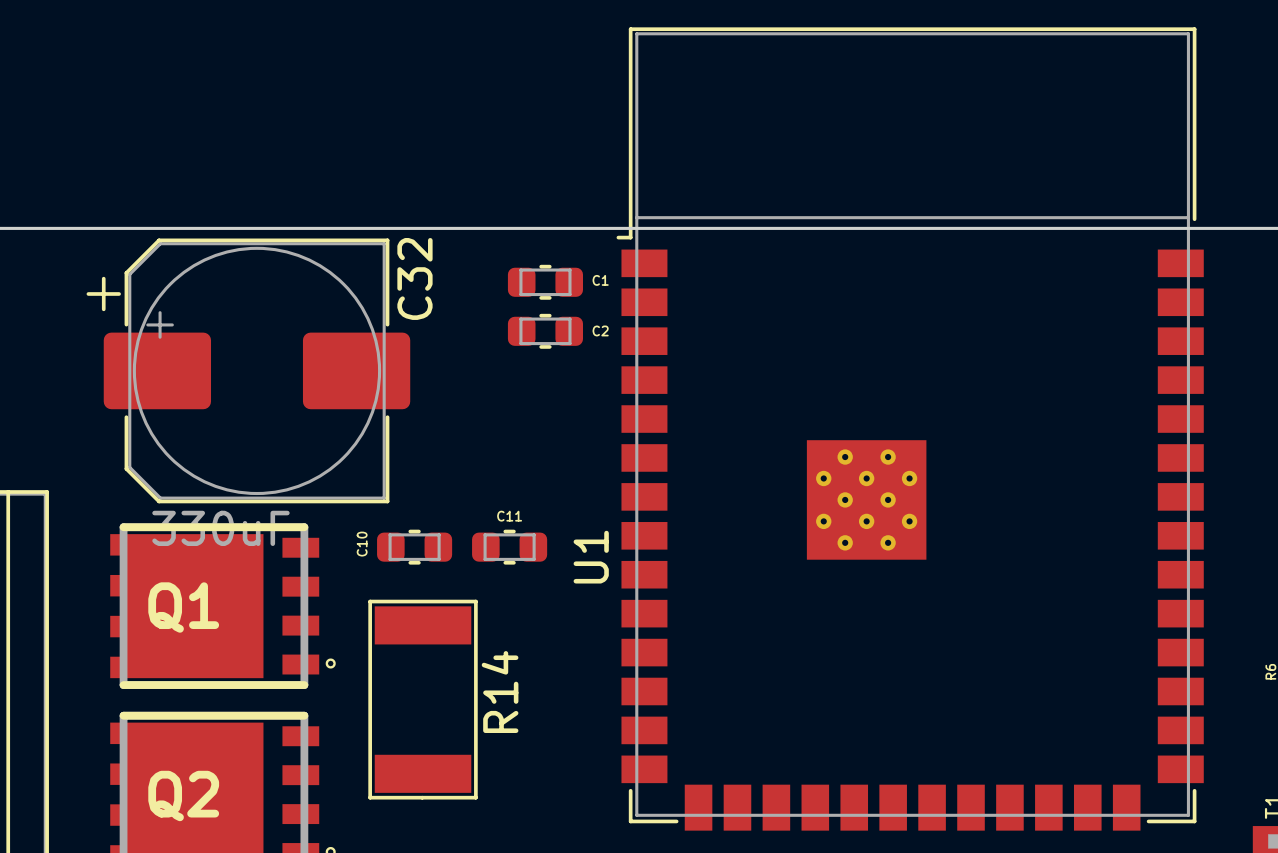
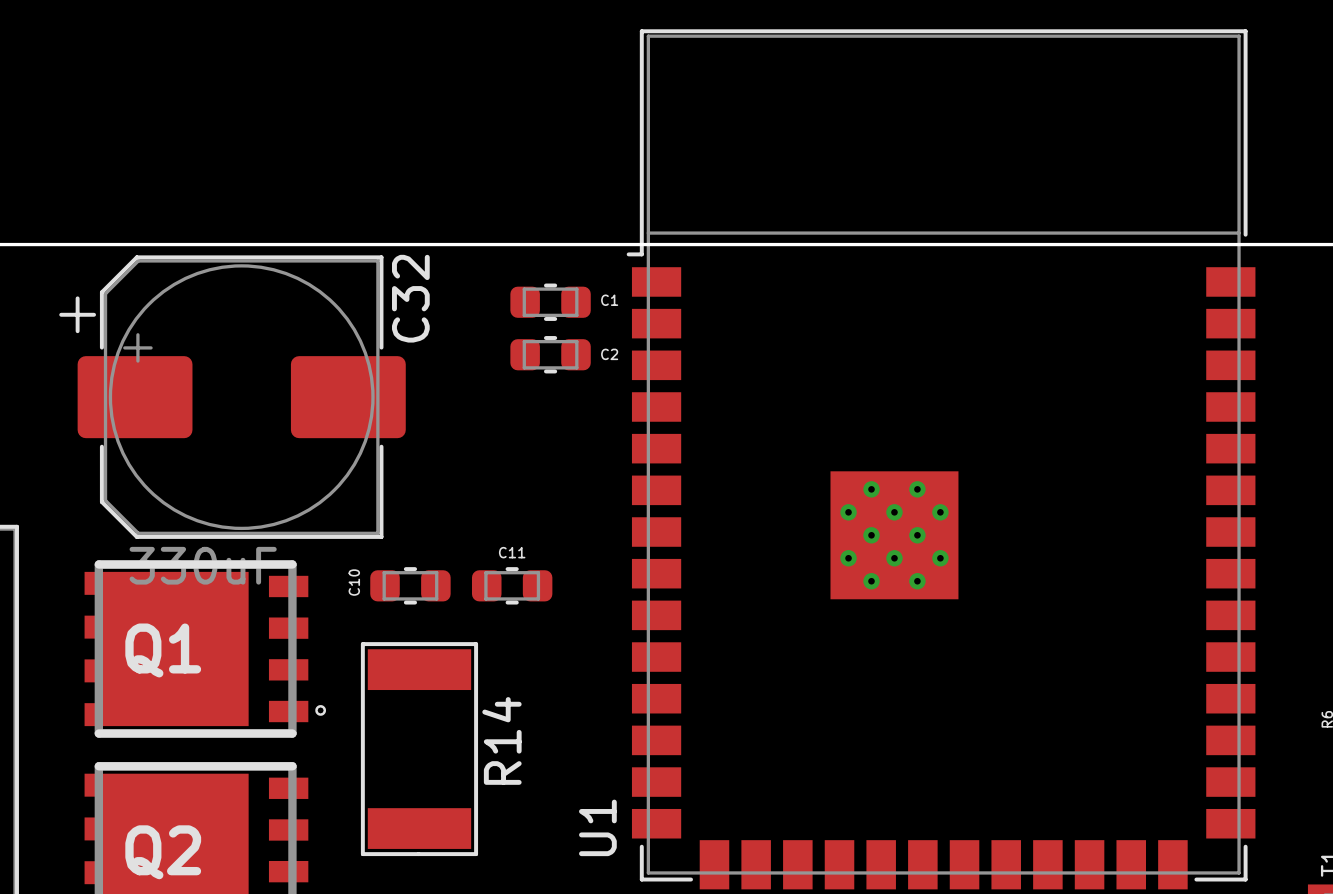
U1 name position: U1 (591, 557) -> U1 (597, 827)

